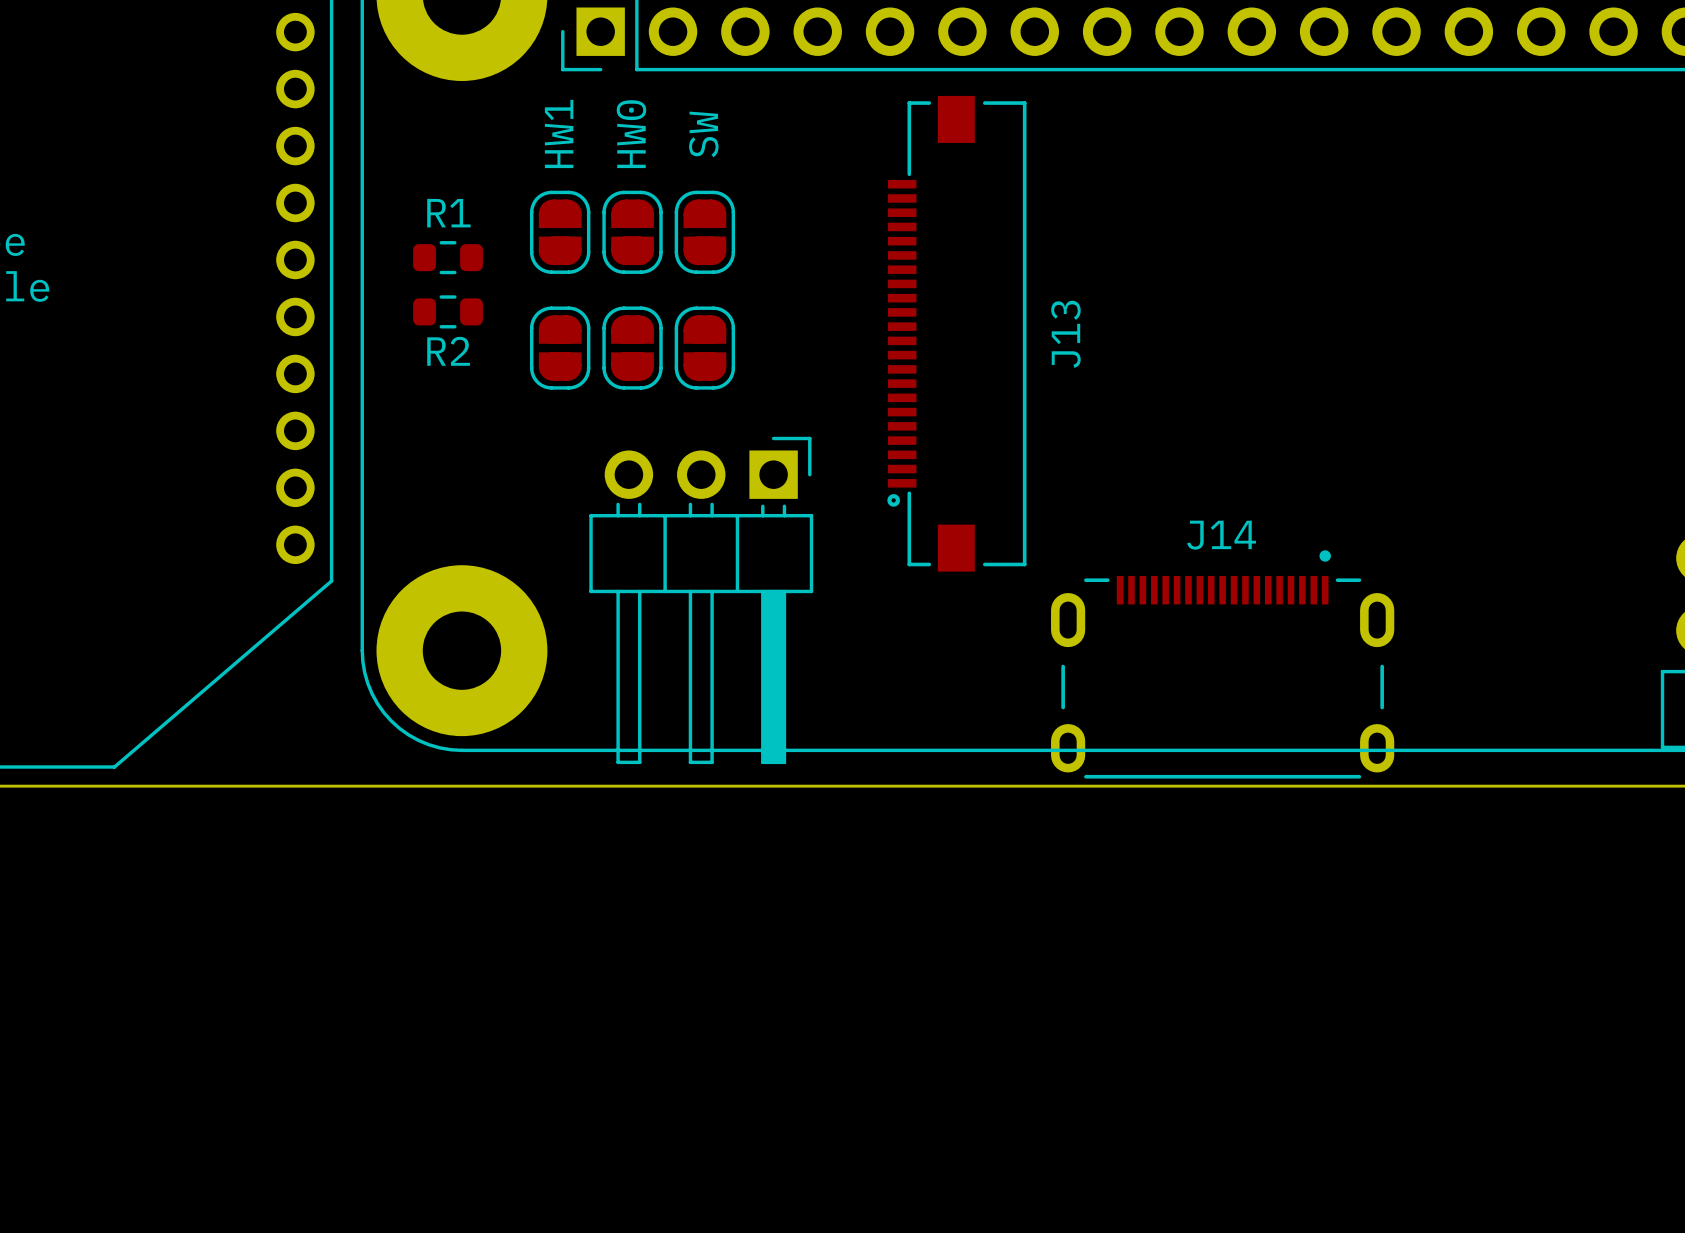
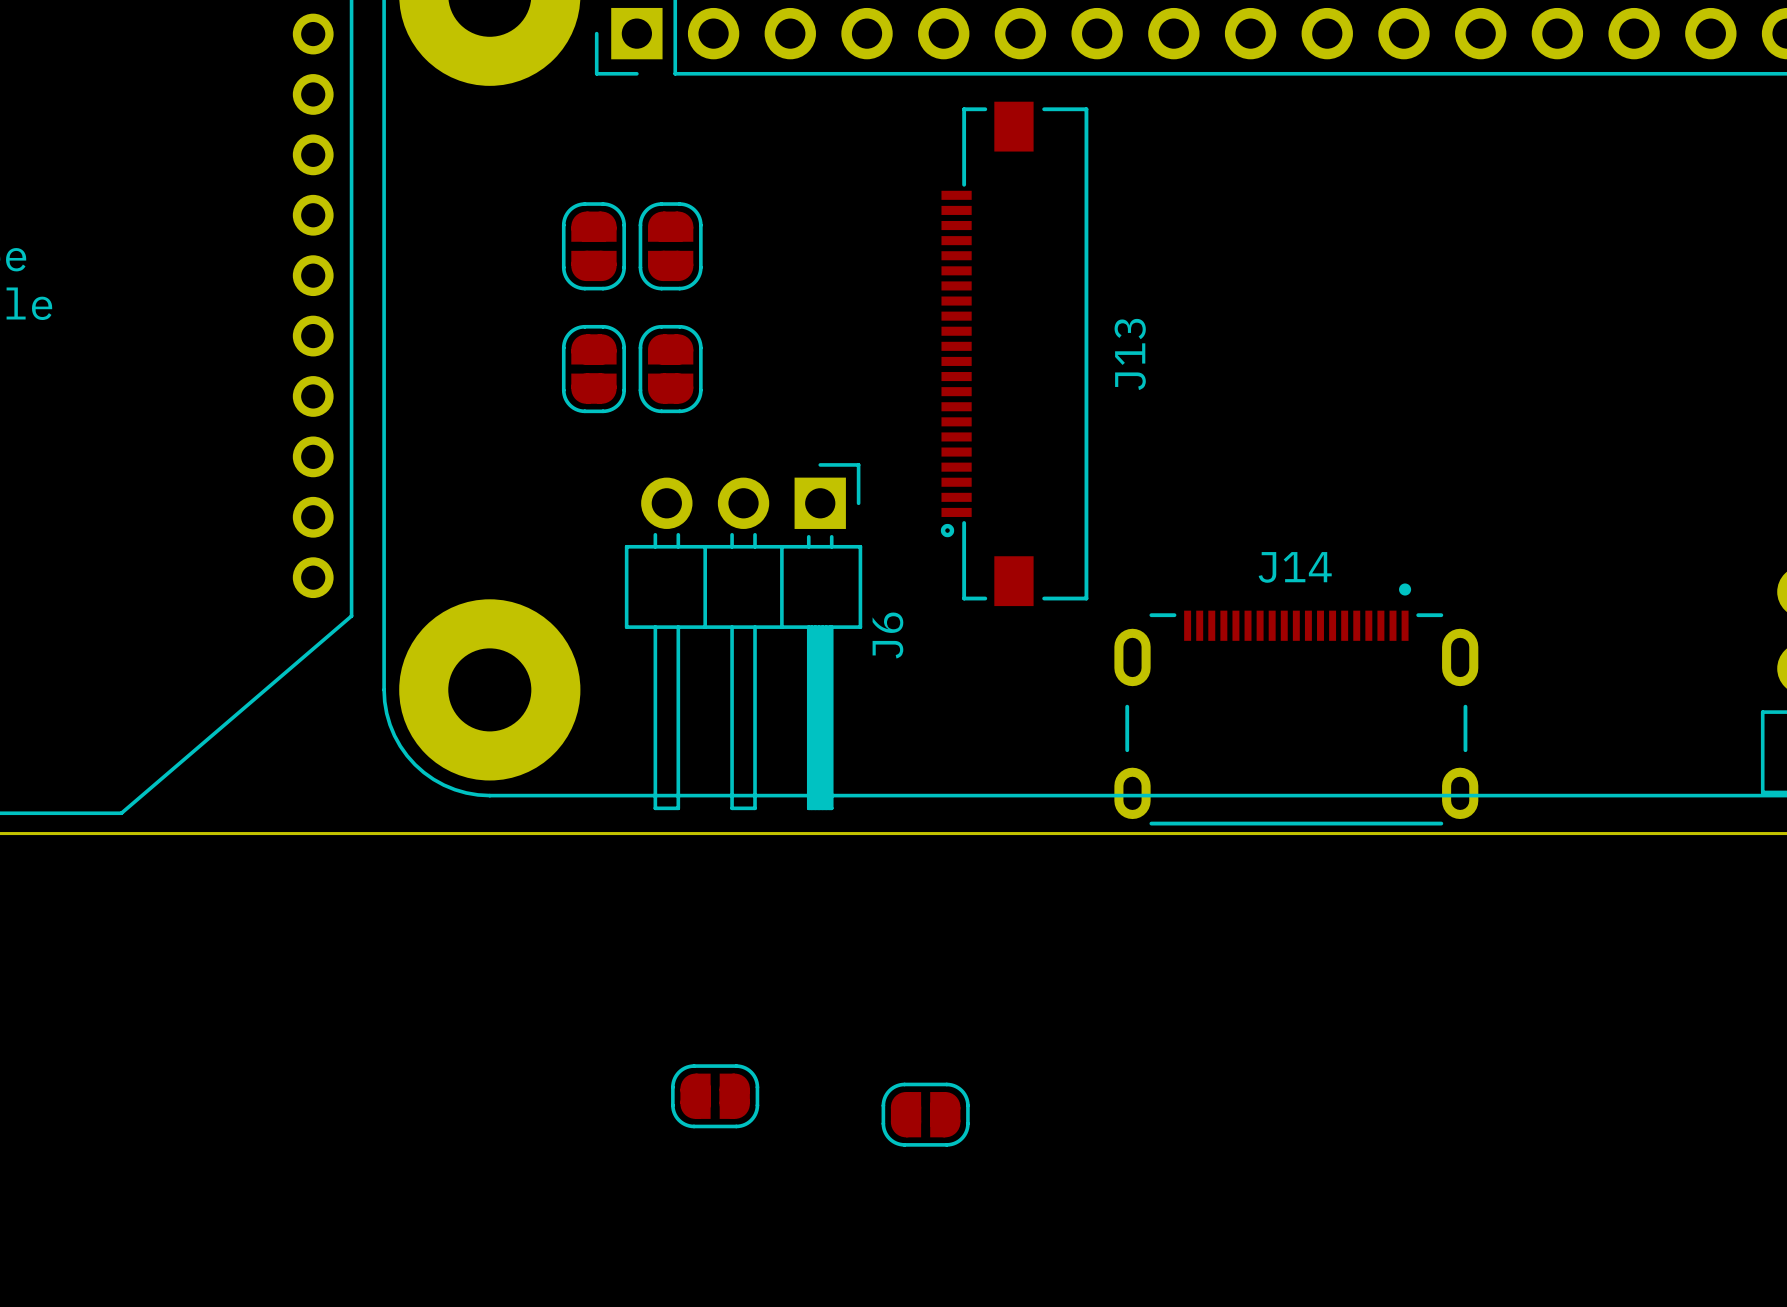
text: HW1 (559, 133) -> none
text: HW0 (631, 134) -> none
text: SW (703, 134) -> none
part: (704, 232) -> none
R1: (448, 257) -> none
R2: (448, 311) -> none
part: (704, 348) -> none
J6 name: none -> J6 (887, 635)
part: none -> (715, 1096)
part: none -> (925, 1114)

